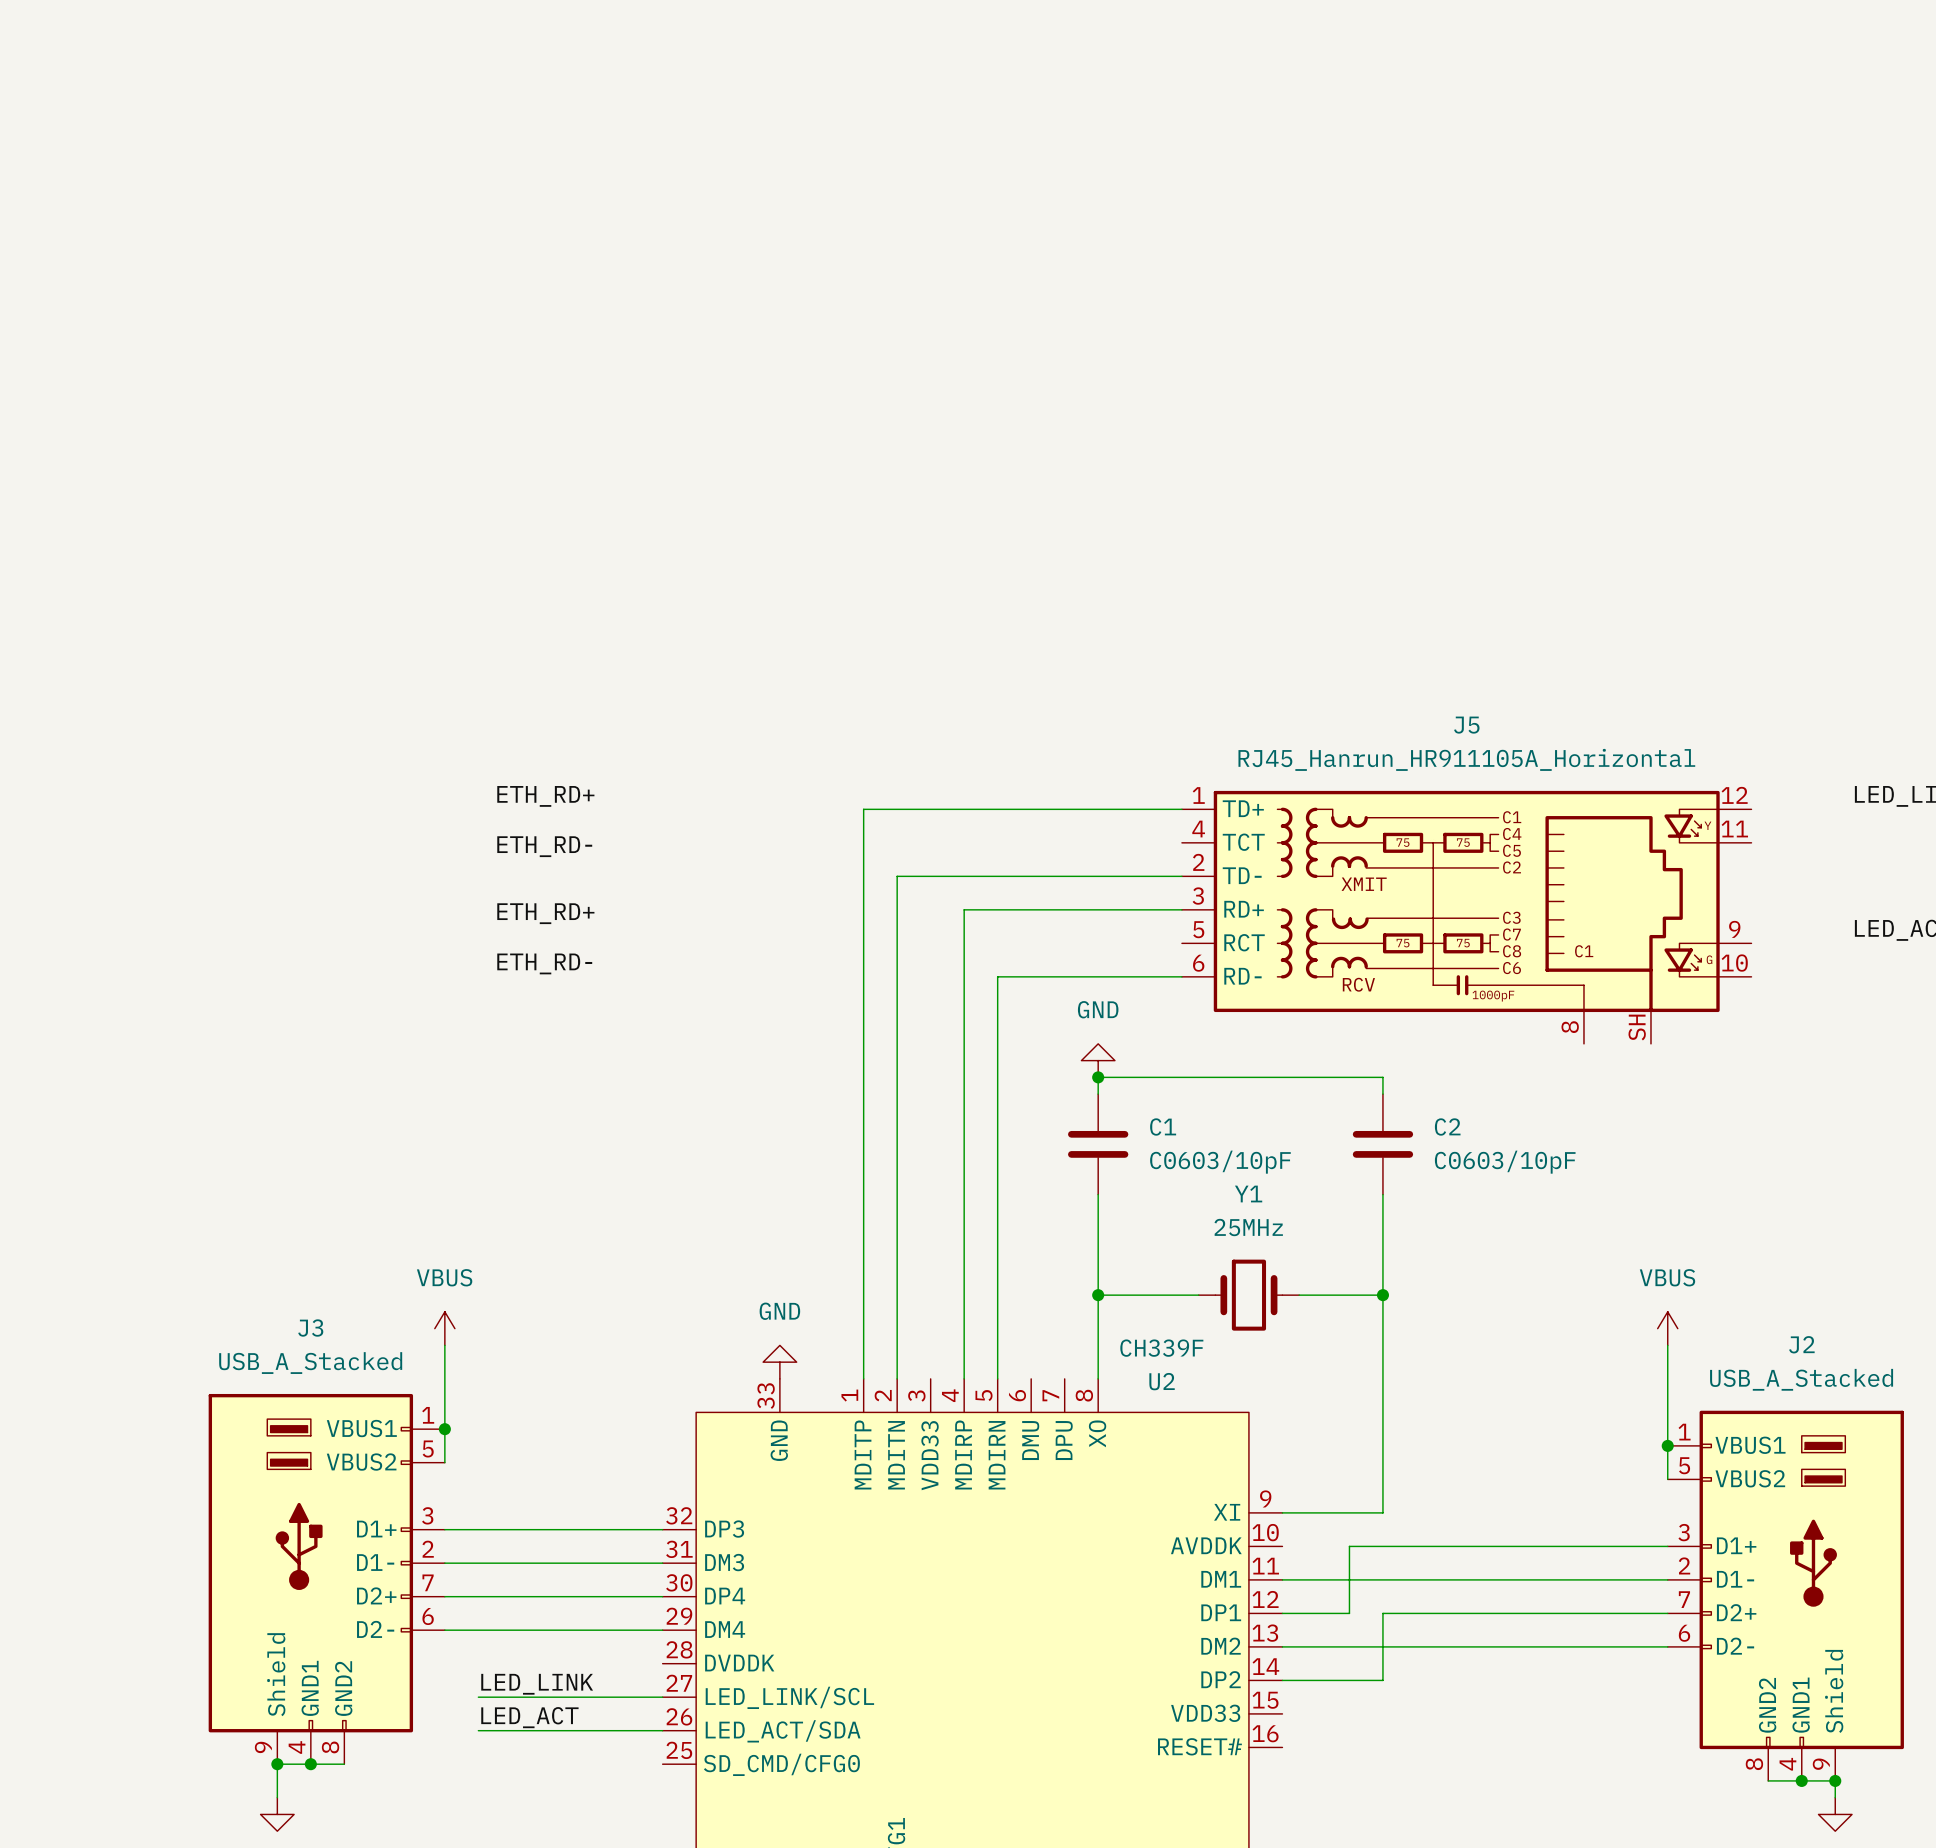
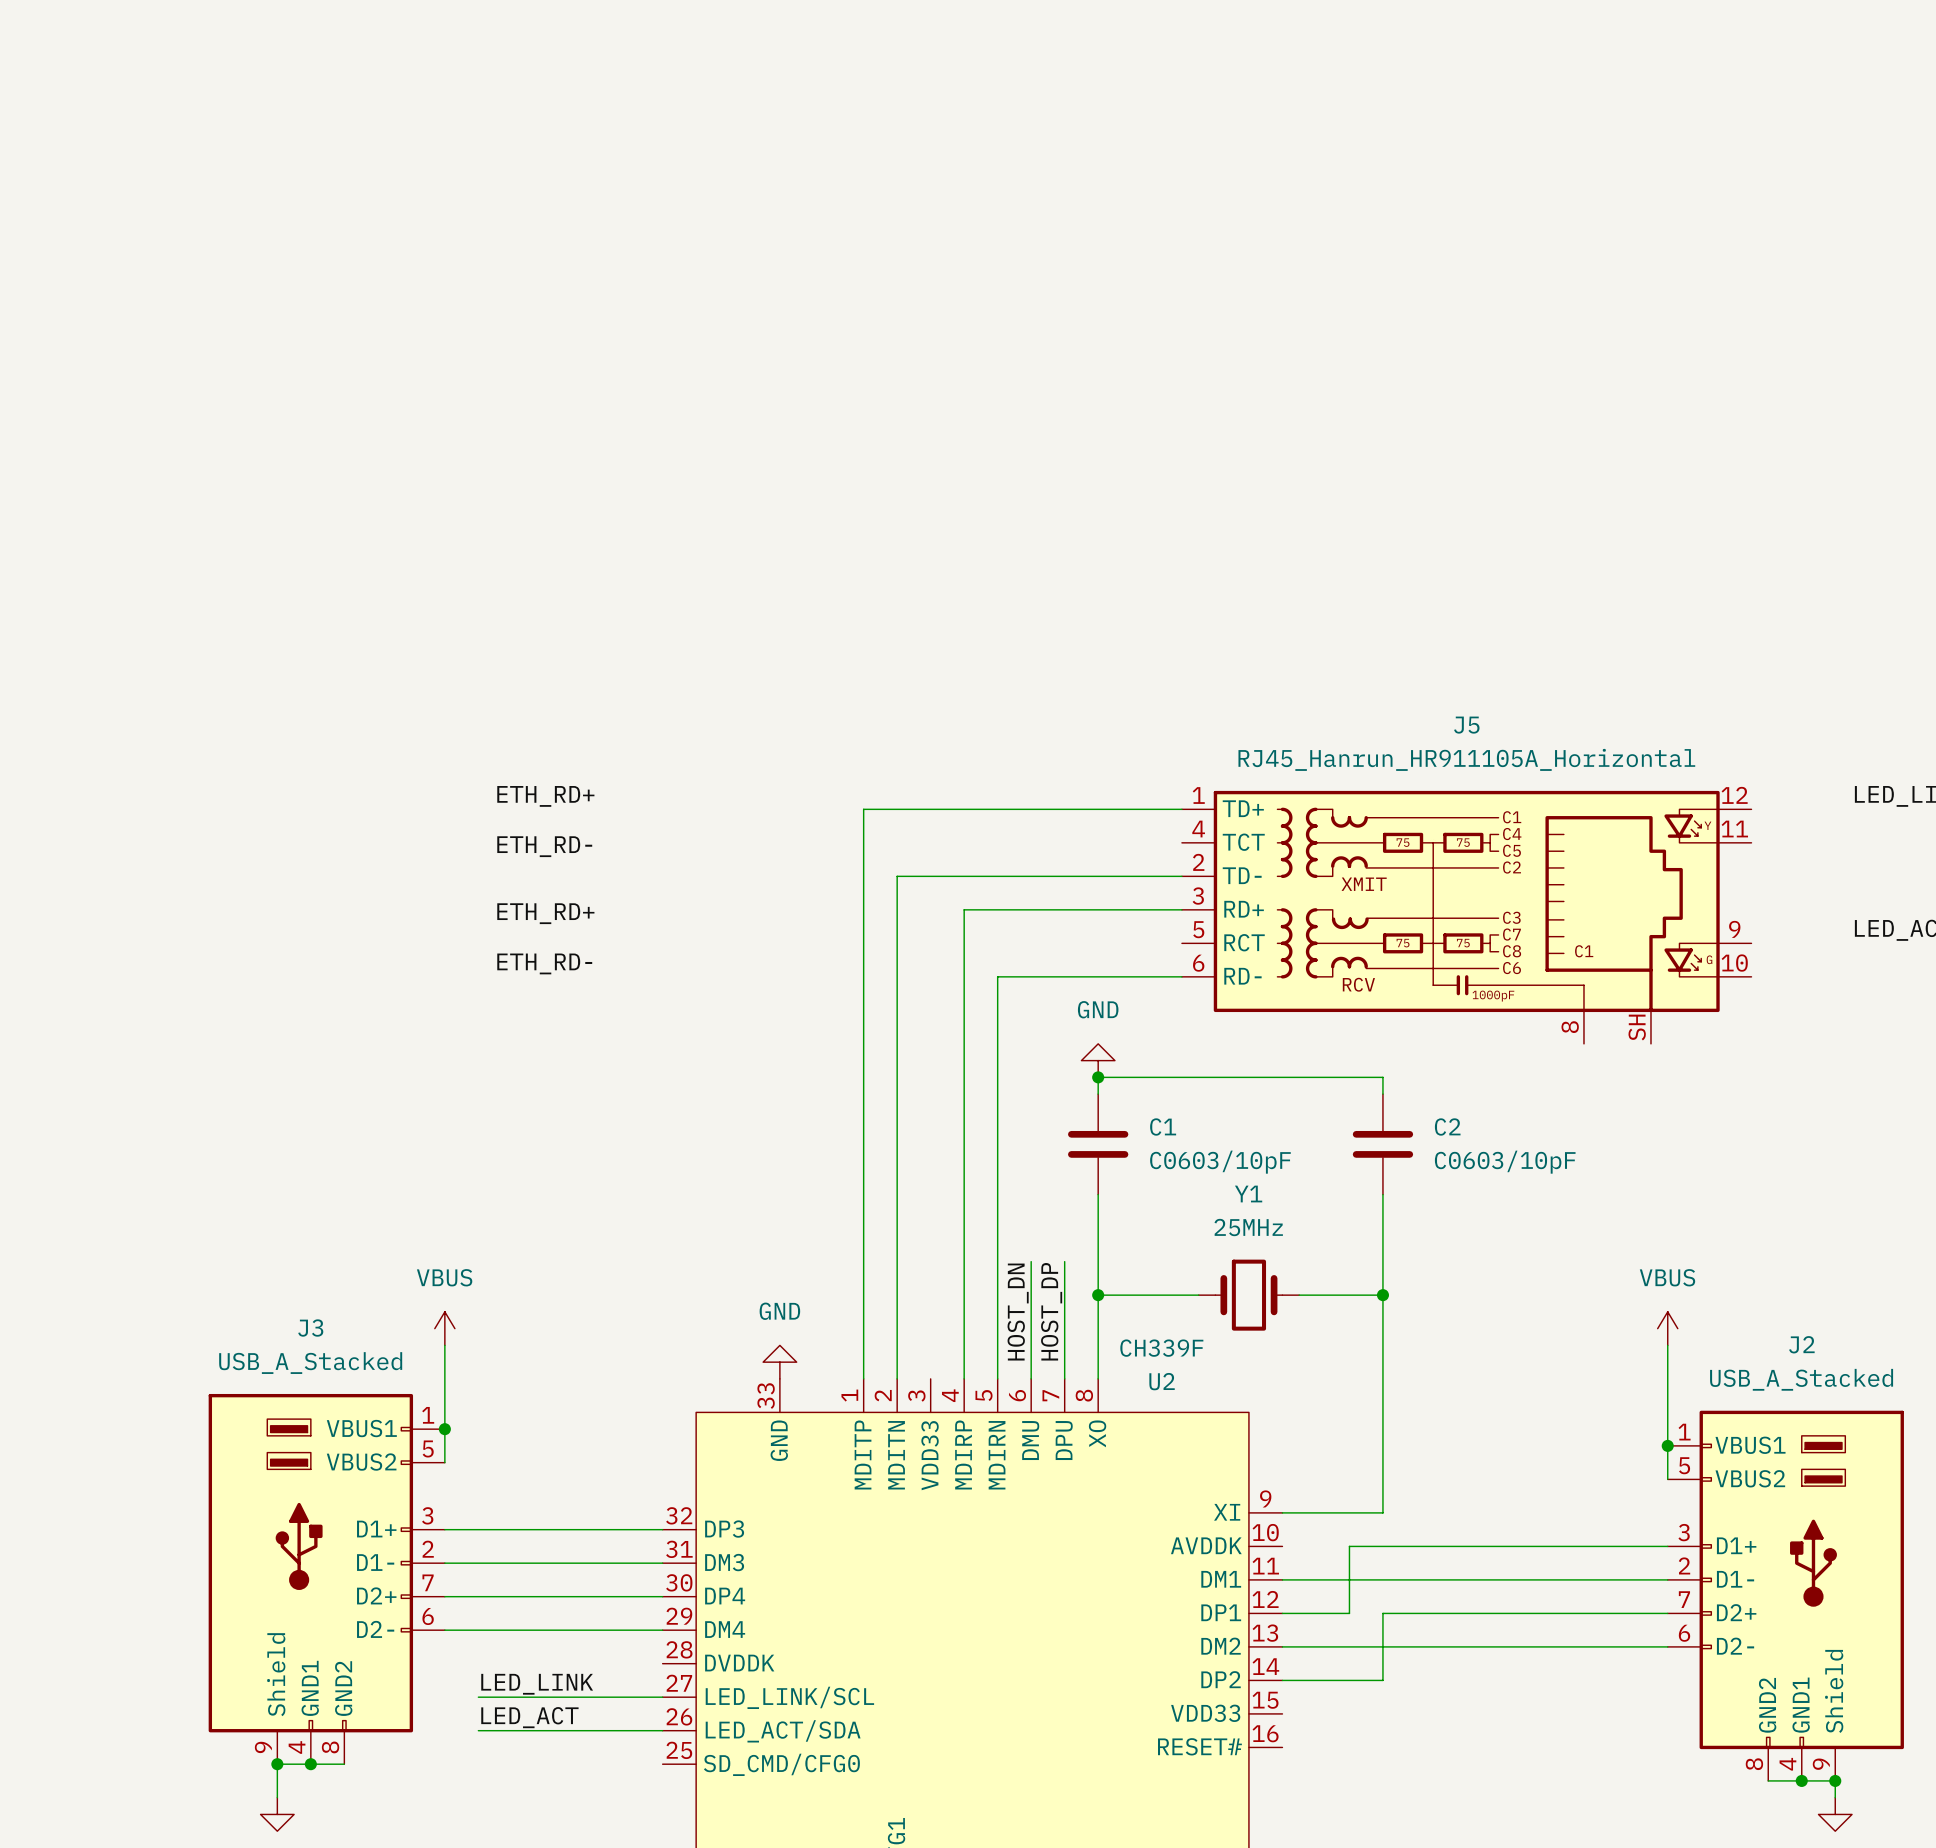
wire: none -> (1031, 1261) (1031, 1378)
wire: none -> (1064, 1261) (1064, 1378)
label: none -> HOST_DP (1051, 1311)
label: none -> HOST_DN (1018, 1312)

